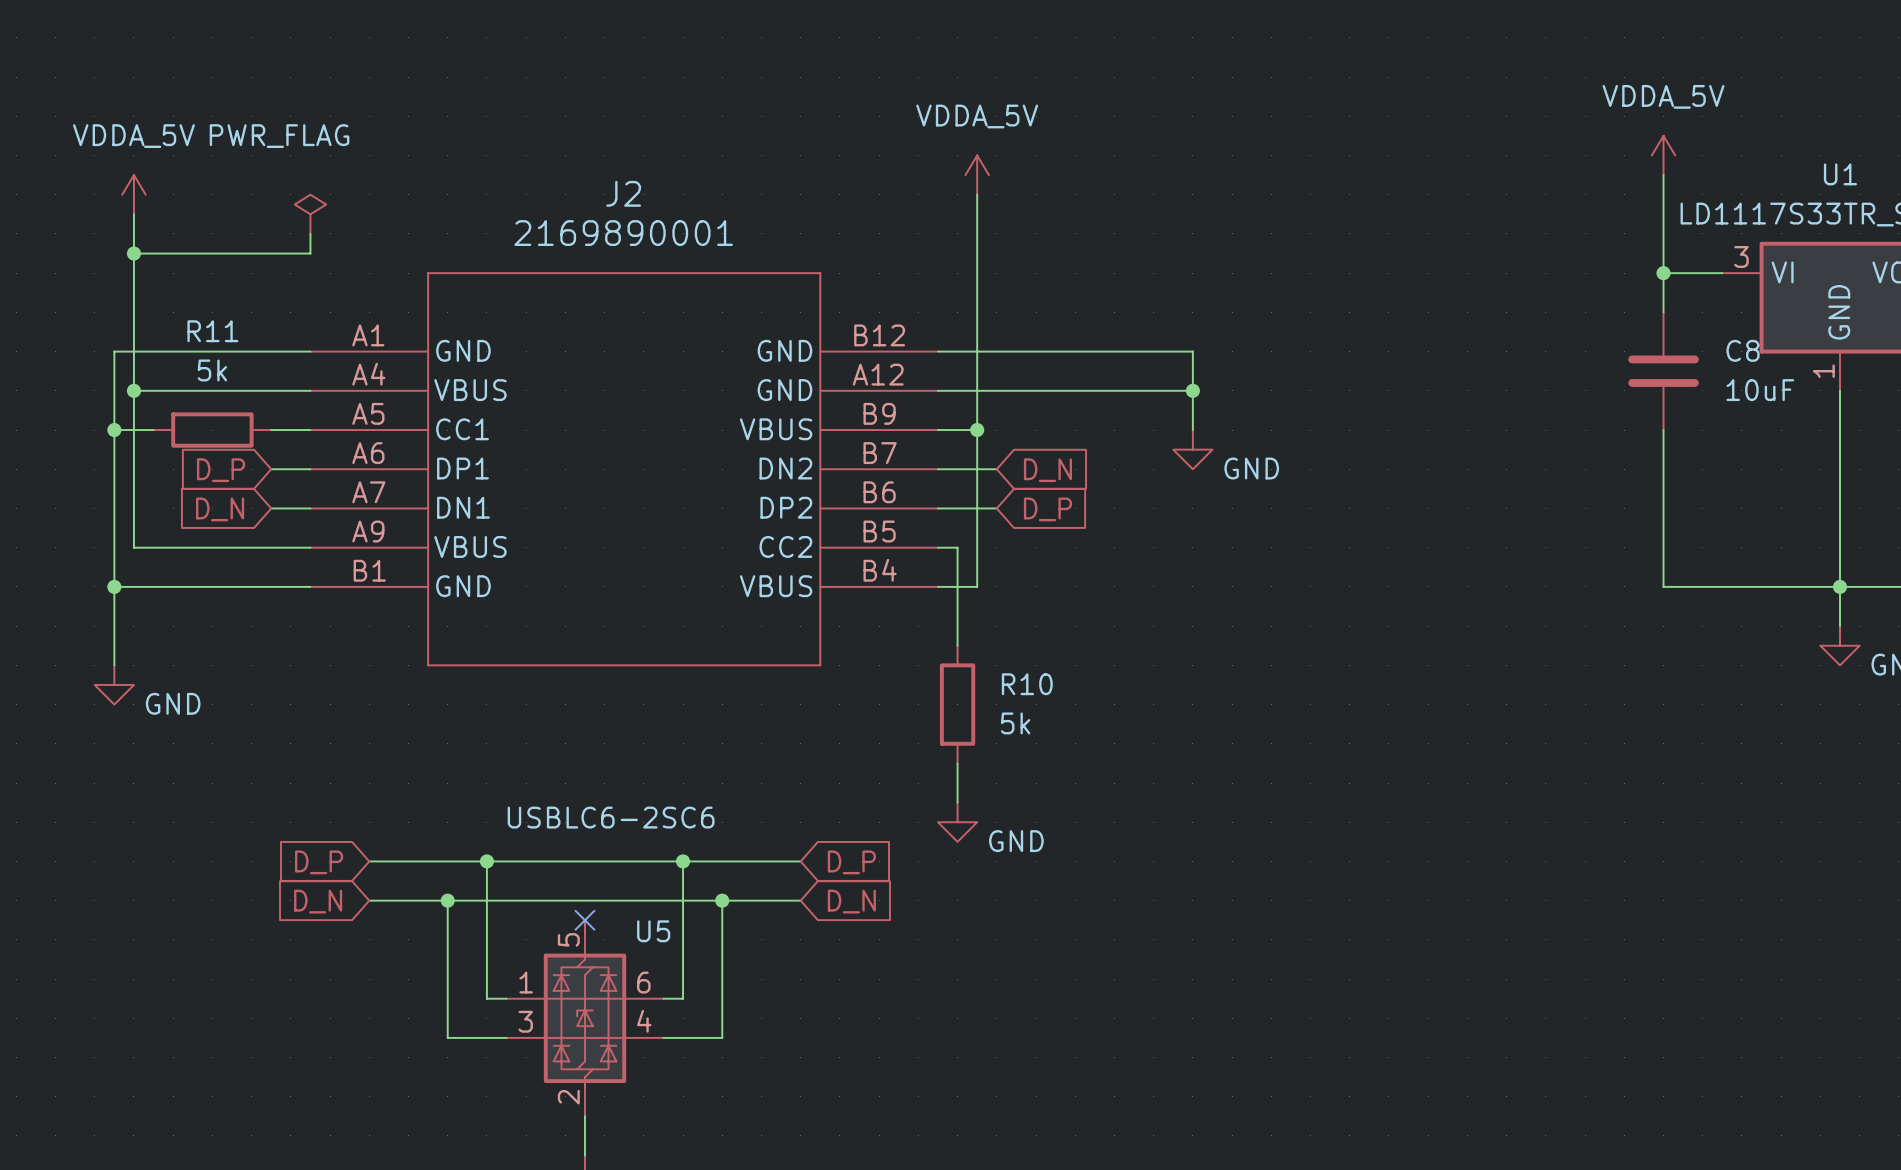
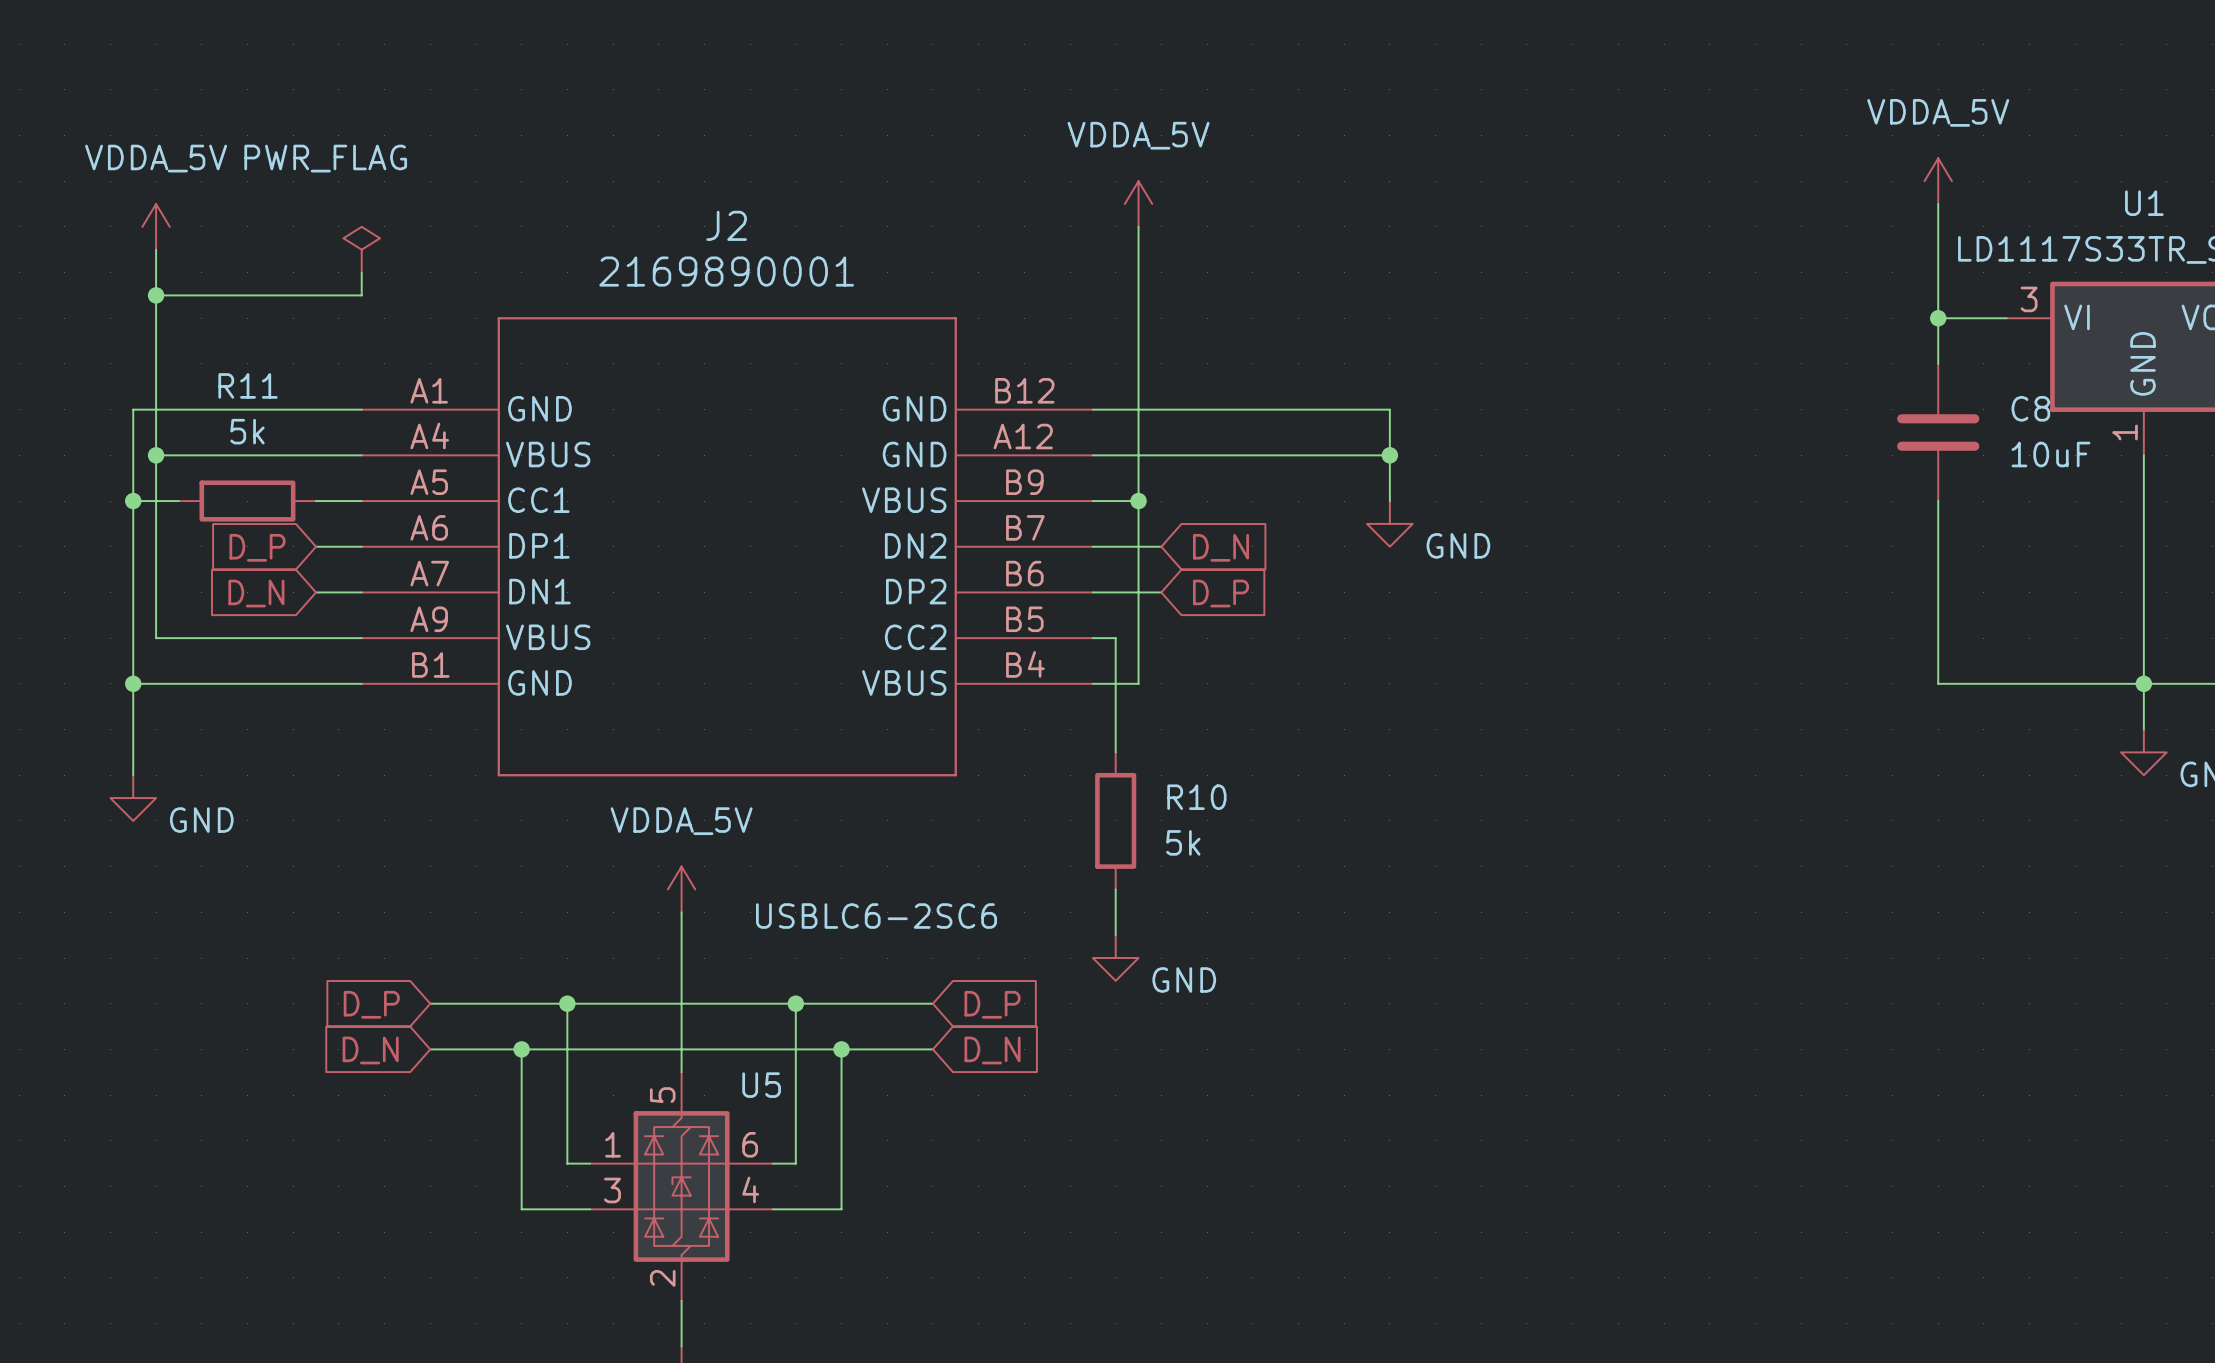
power symbol: none -> VDDA_5V (681, 889)
wire: none -> (681, 912) (681, 1072)
U5 value position: USBLC6-2SC6 (611, 817) -> USBLC6-2SC6 (876, 916)
no-connect mark: (584, 920) -> none

